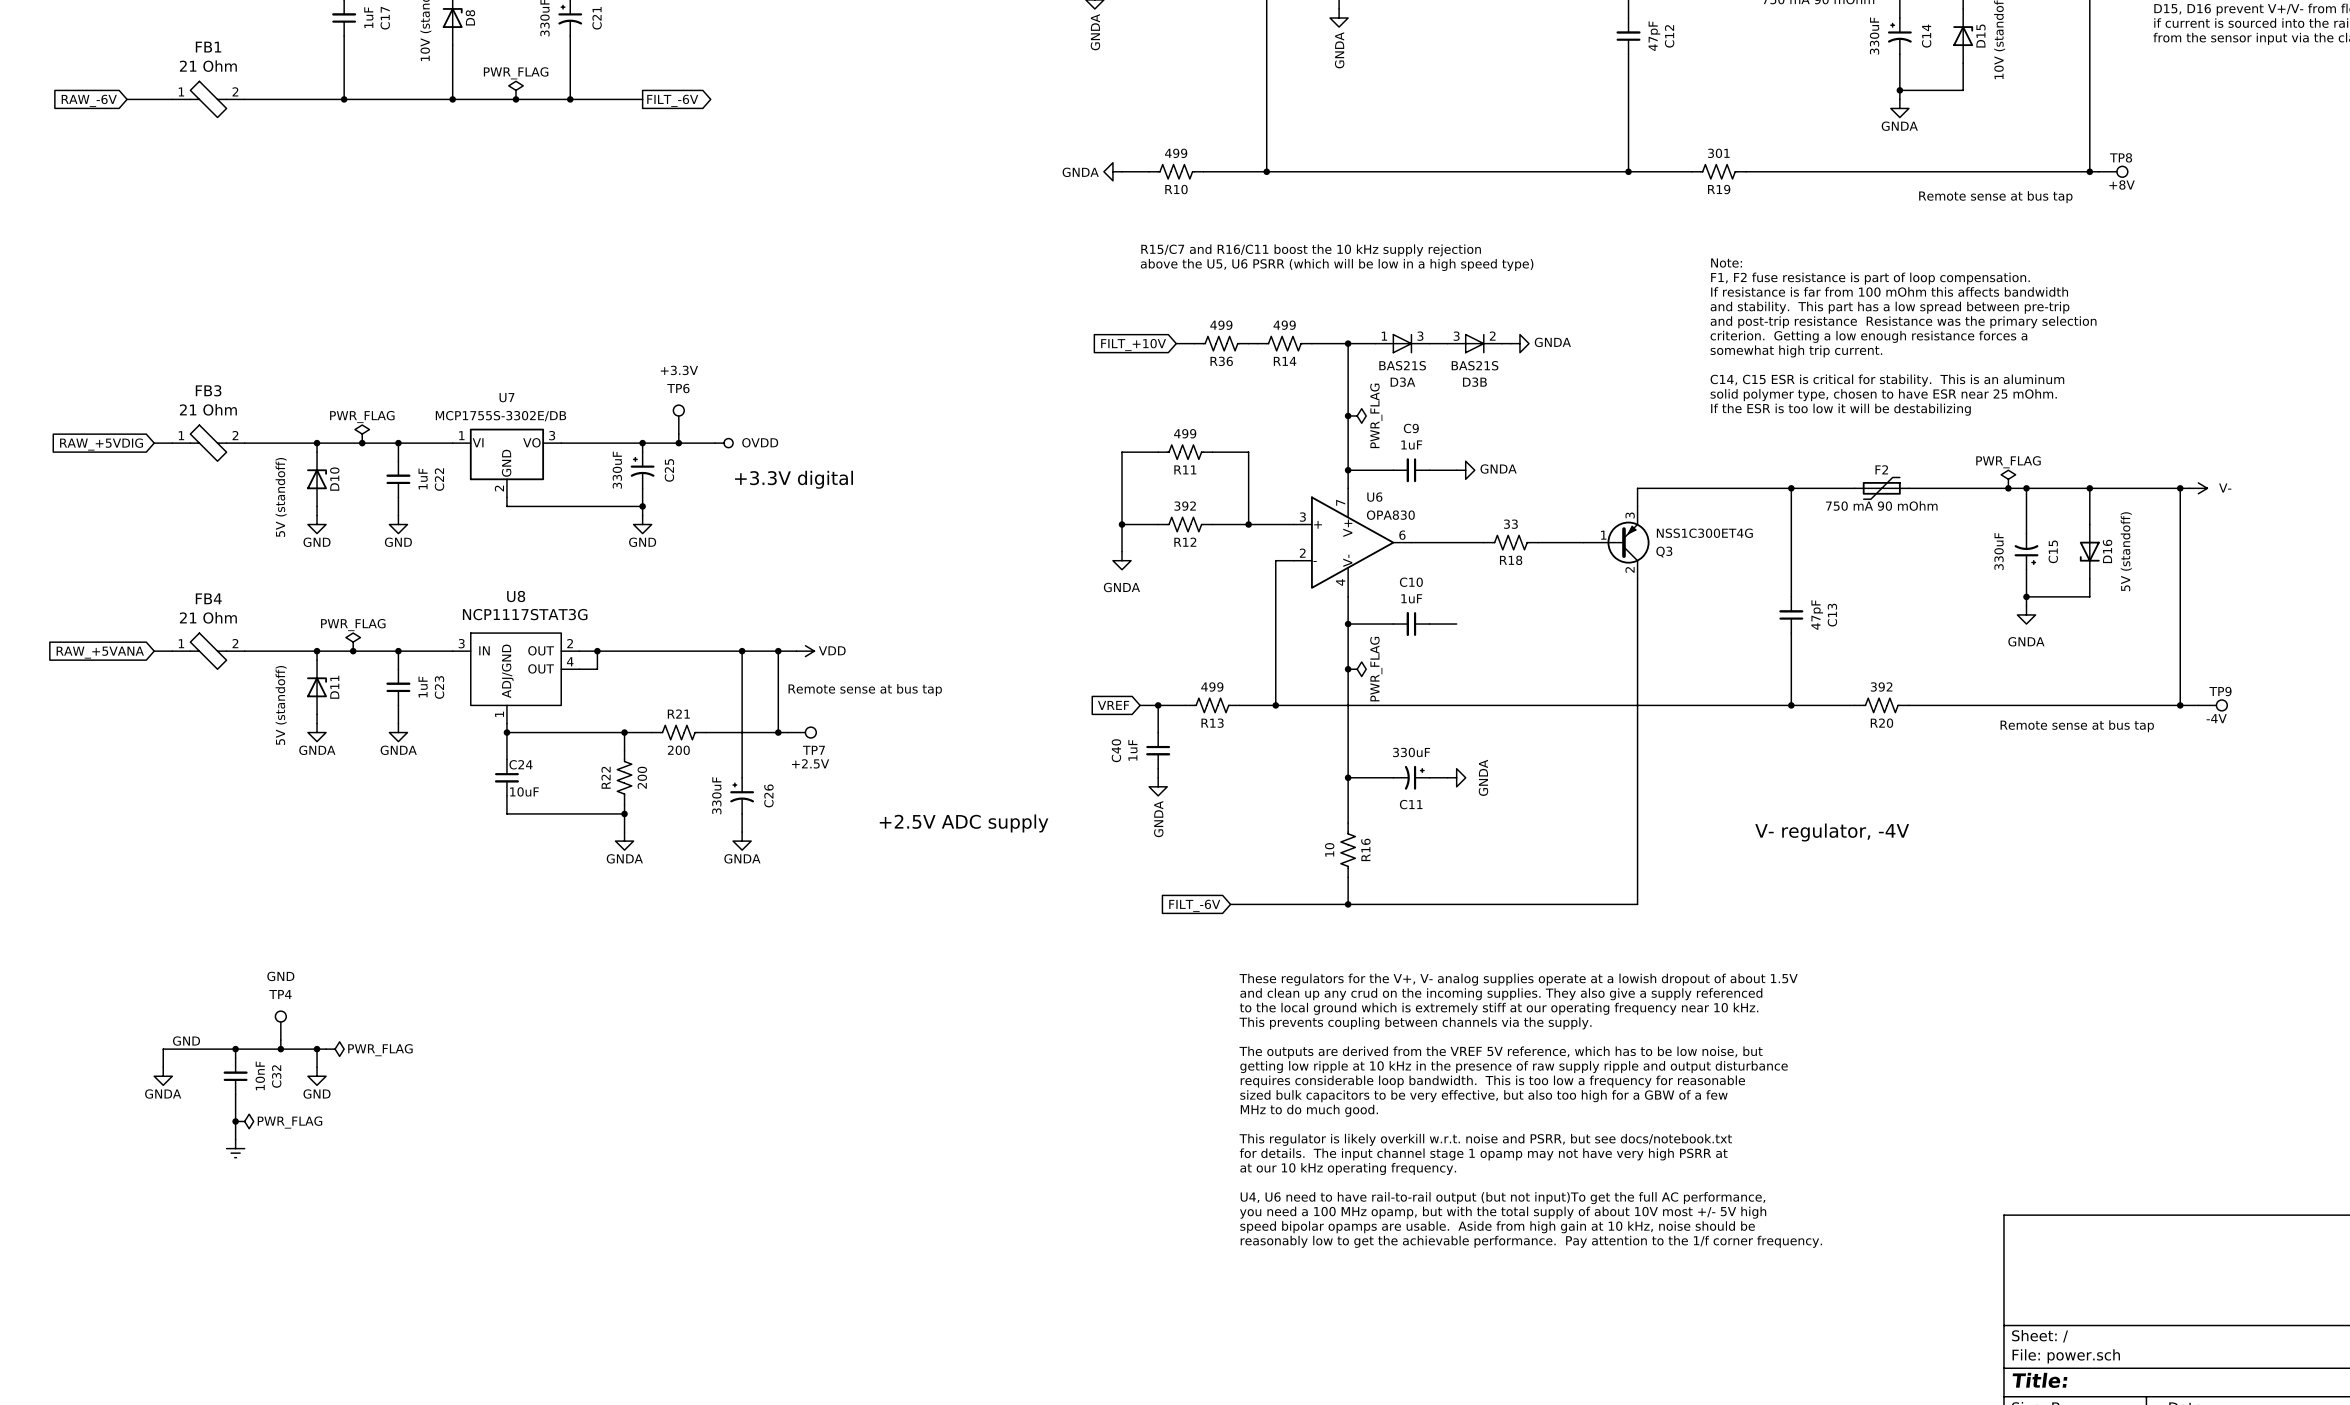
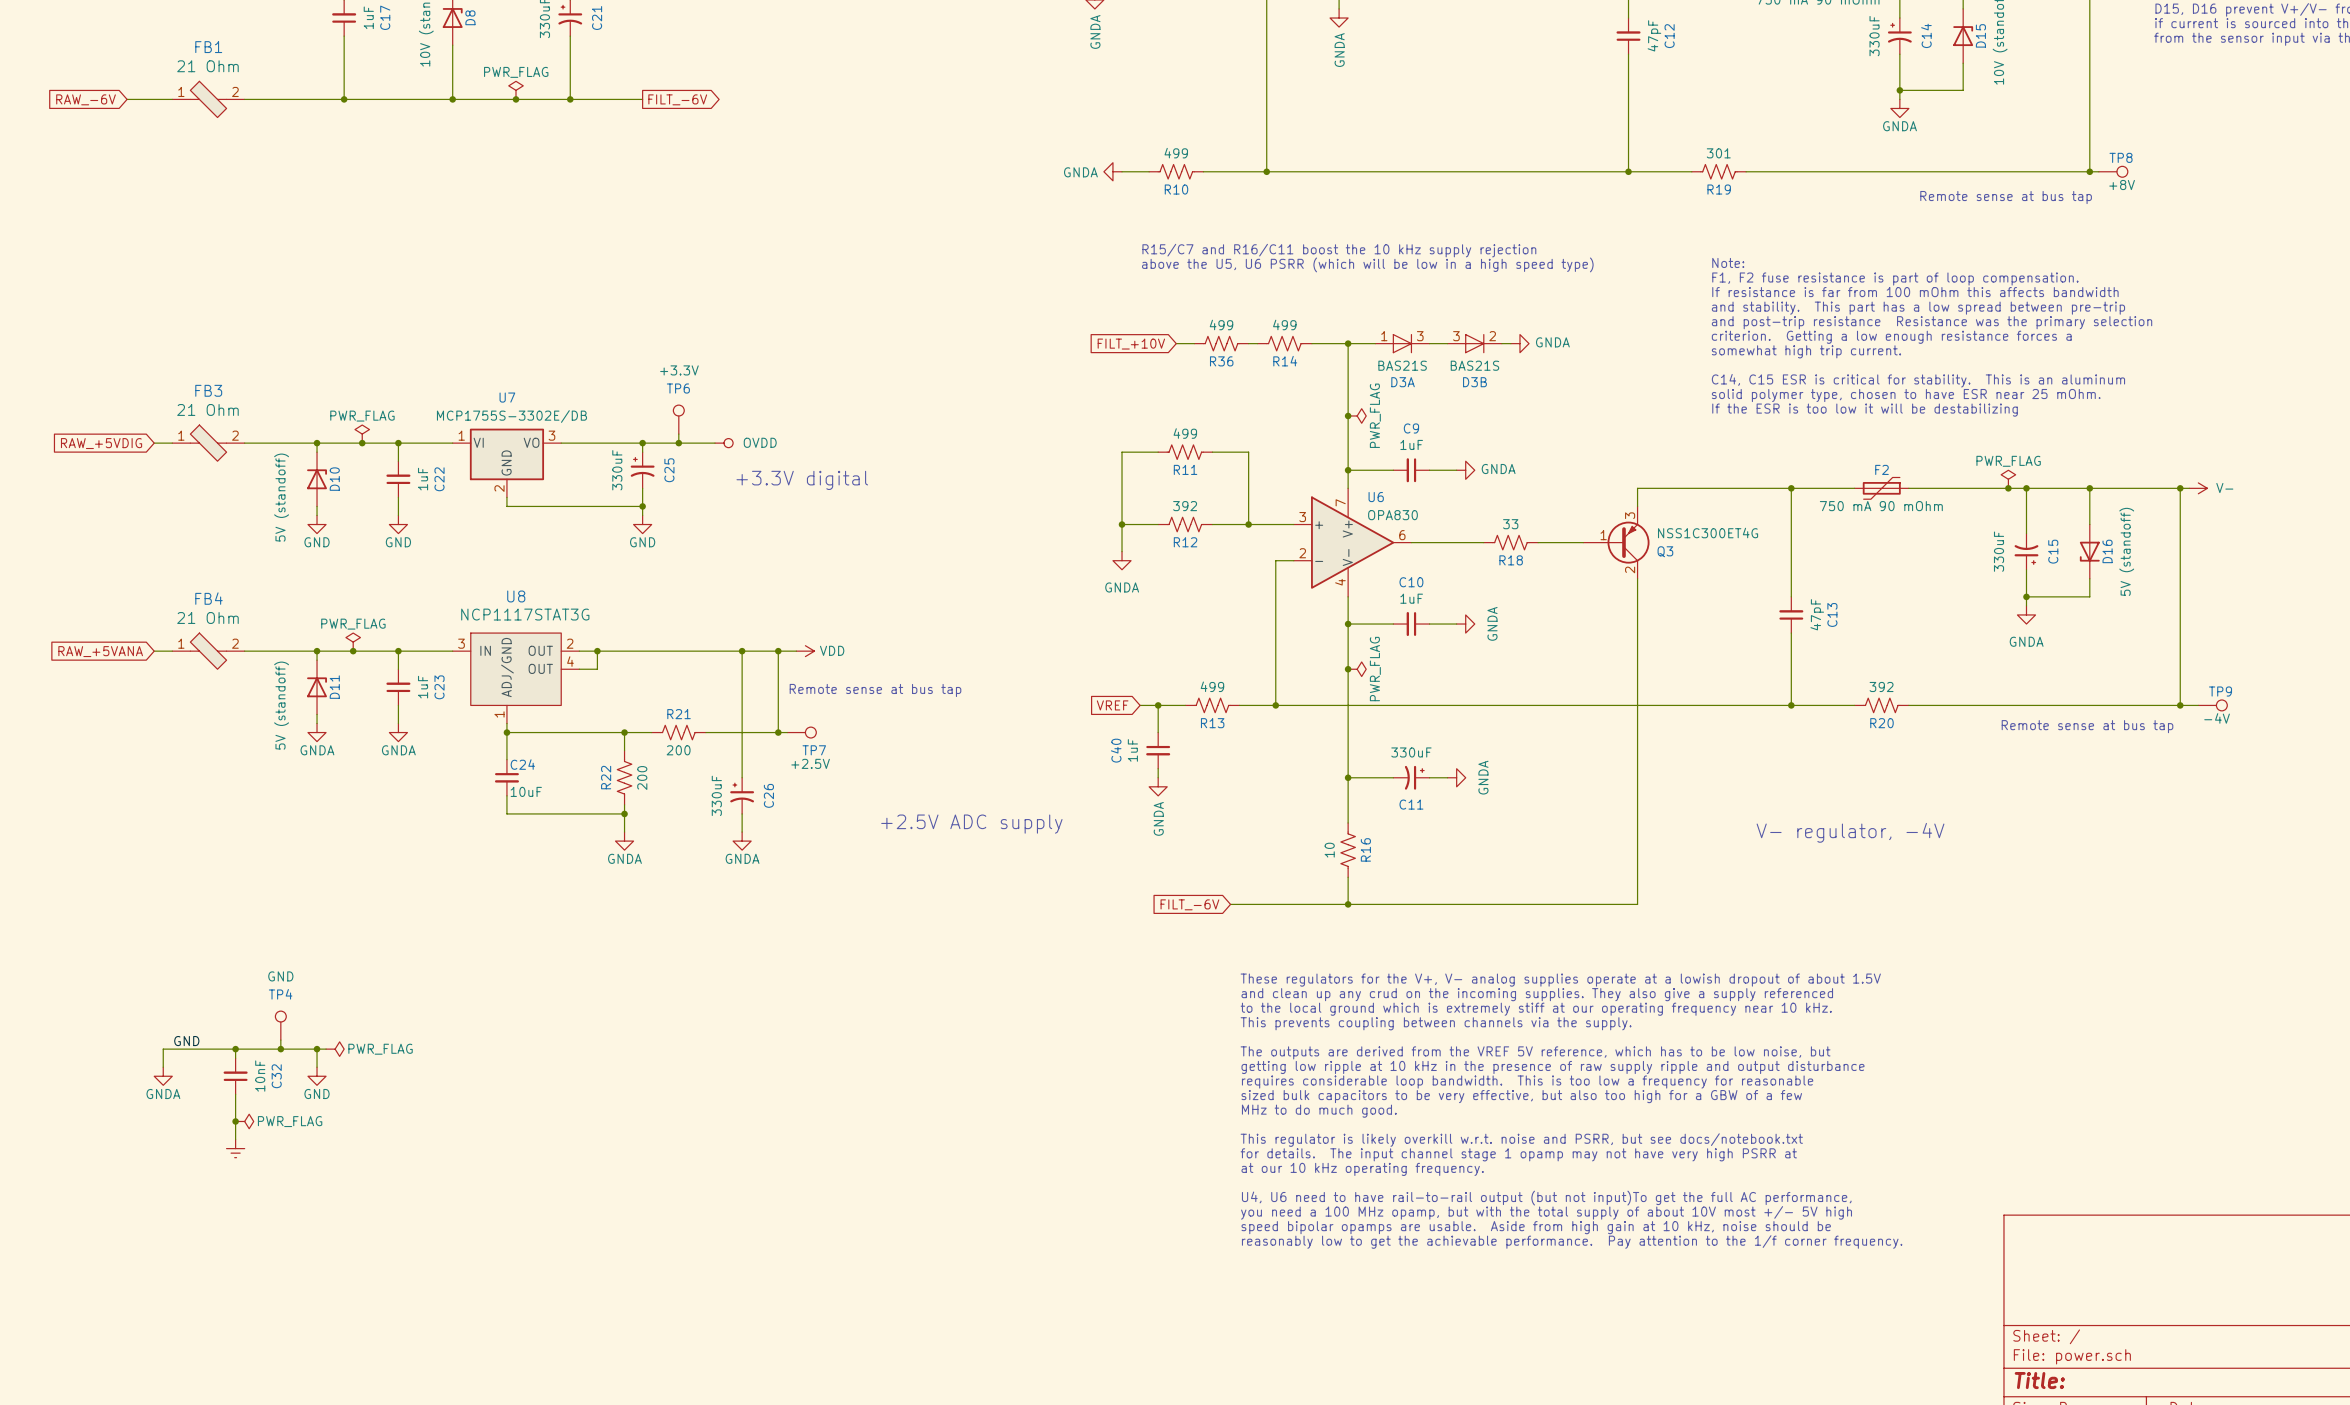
power symbol: none -> GNDA (1465, 624)

